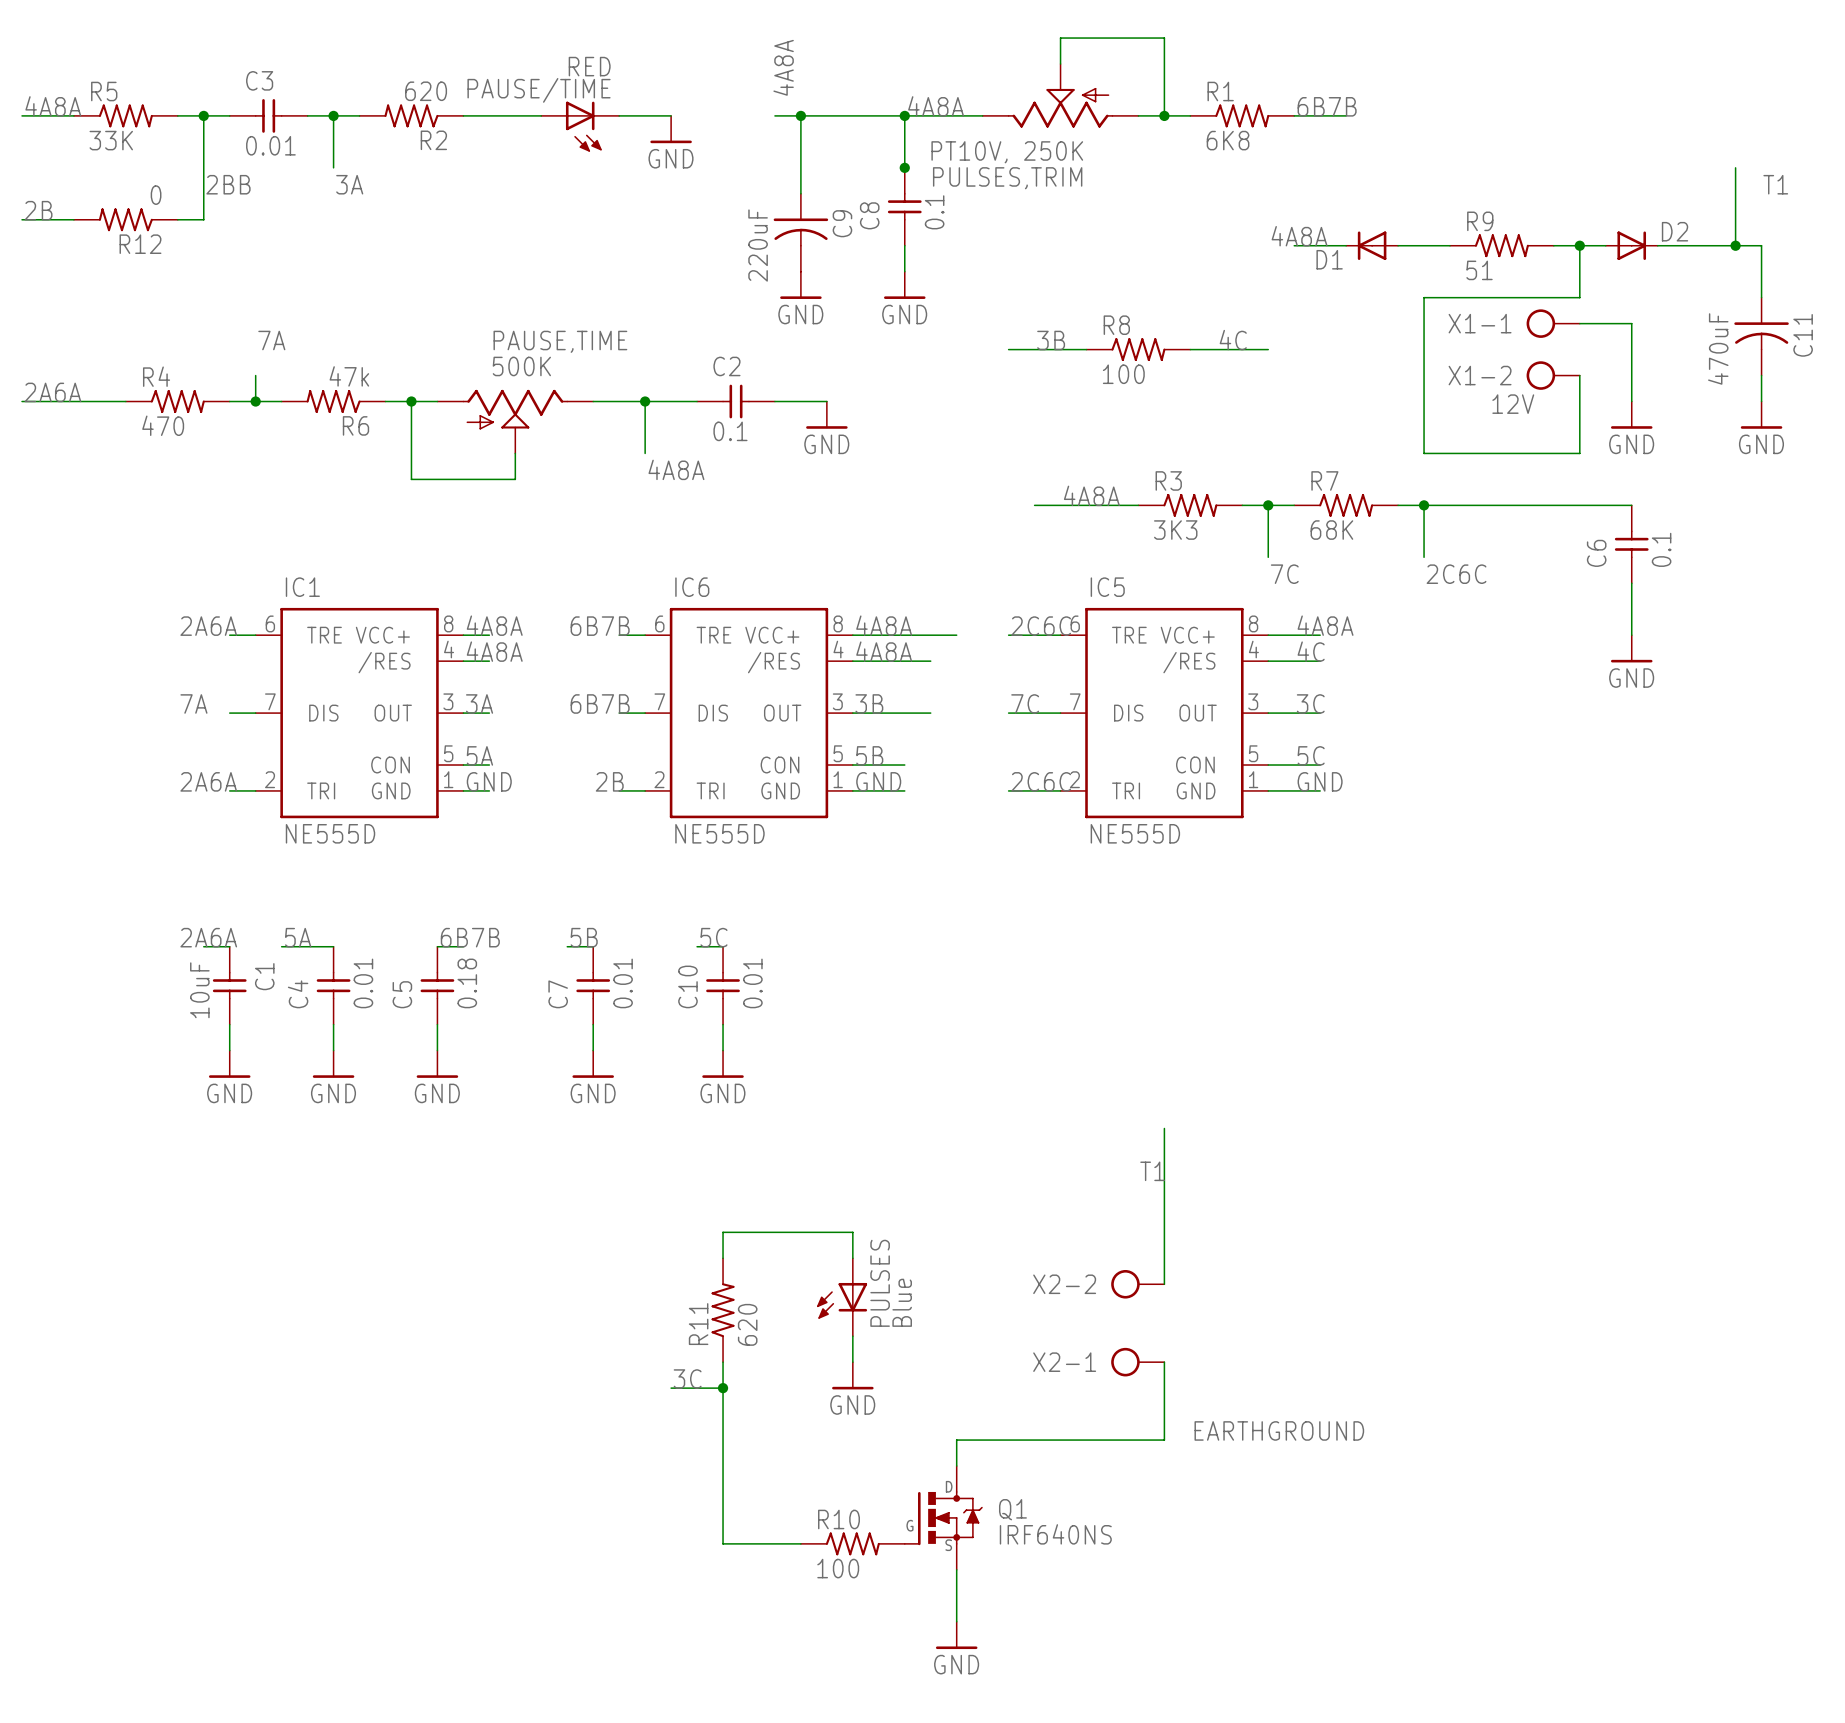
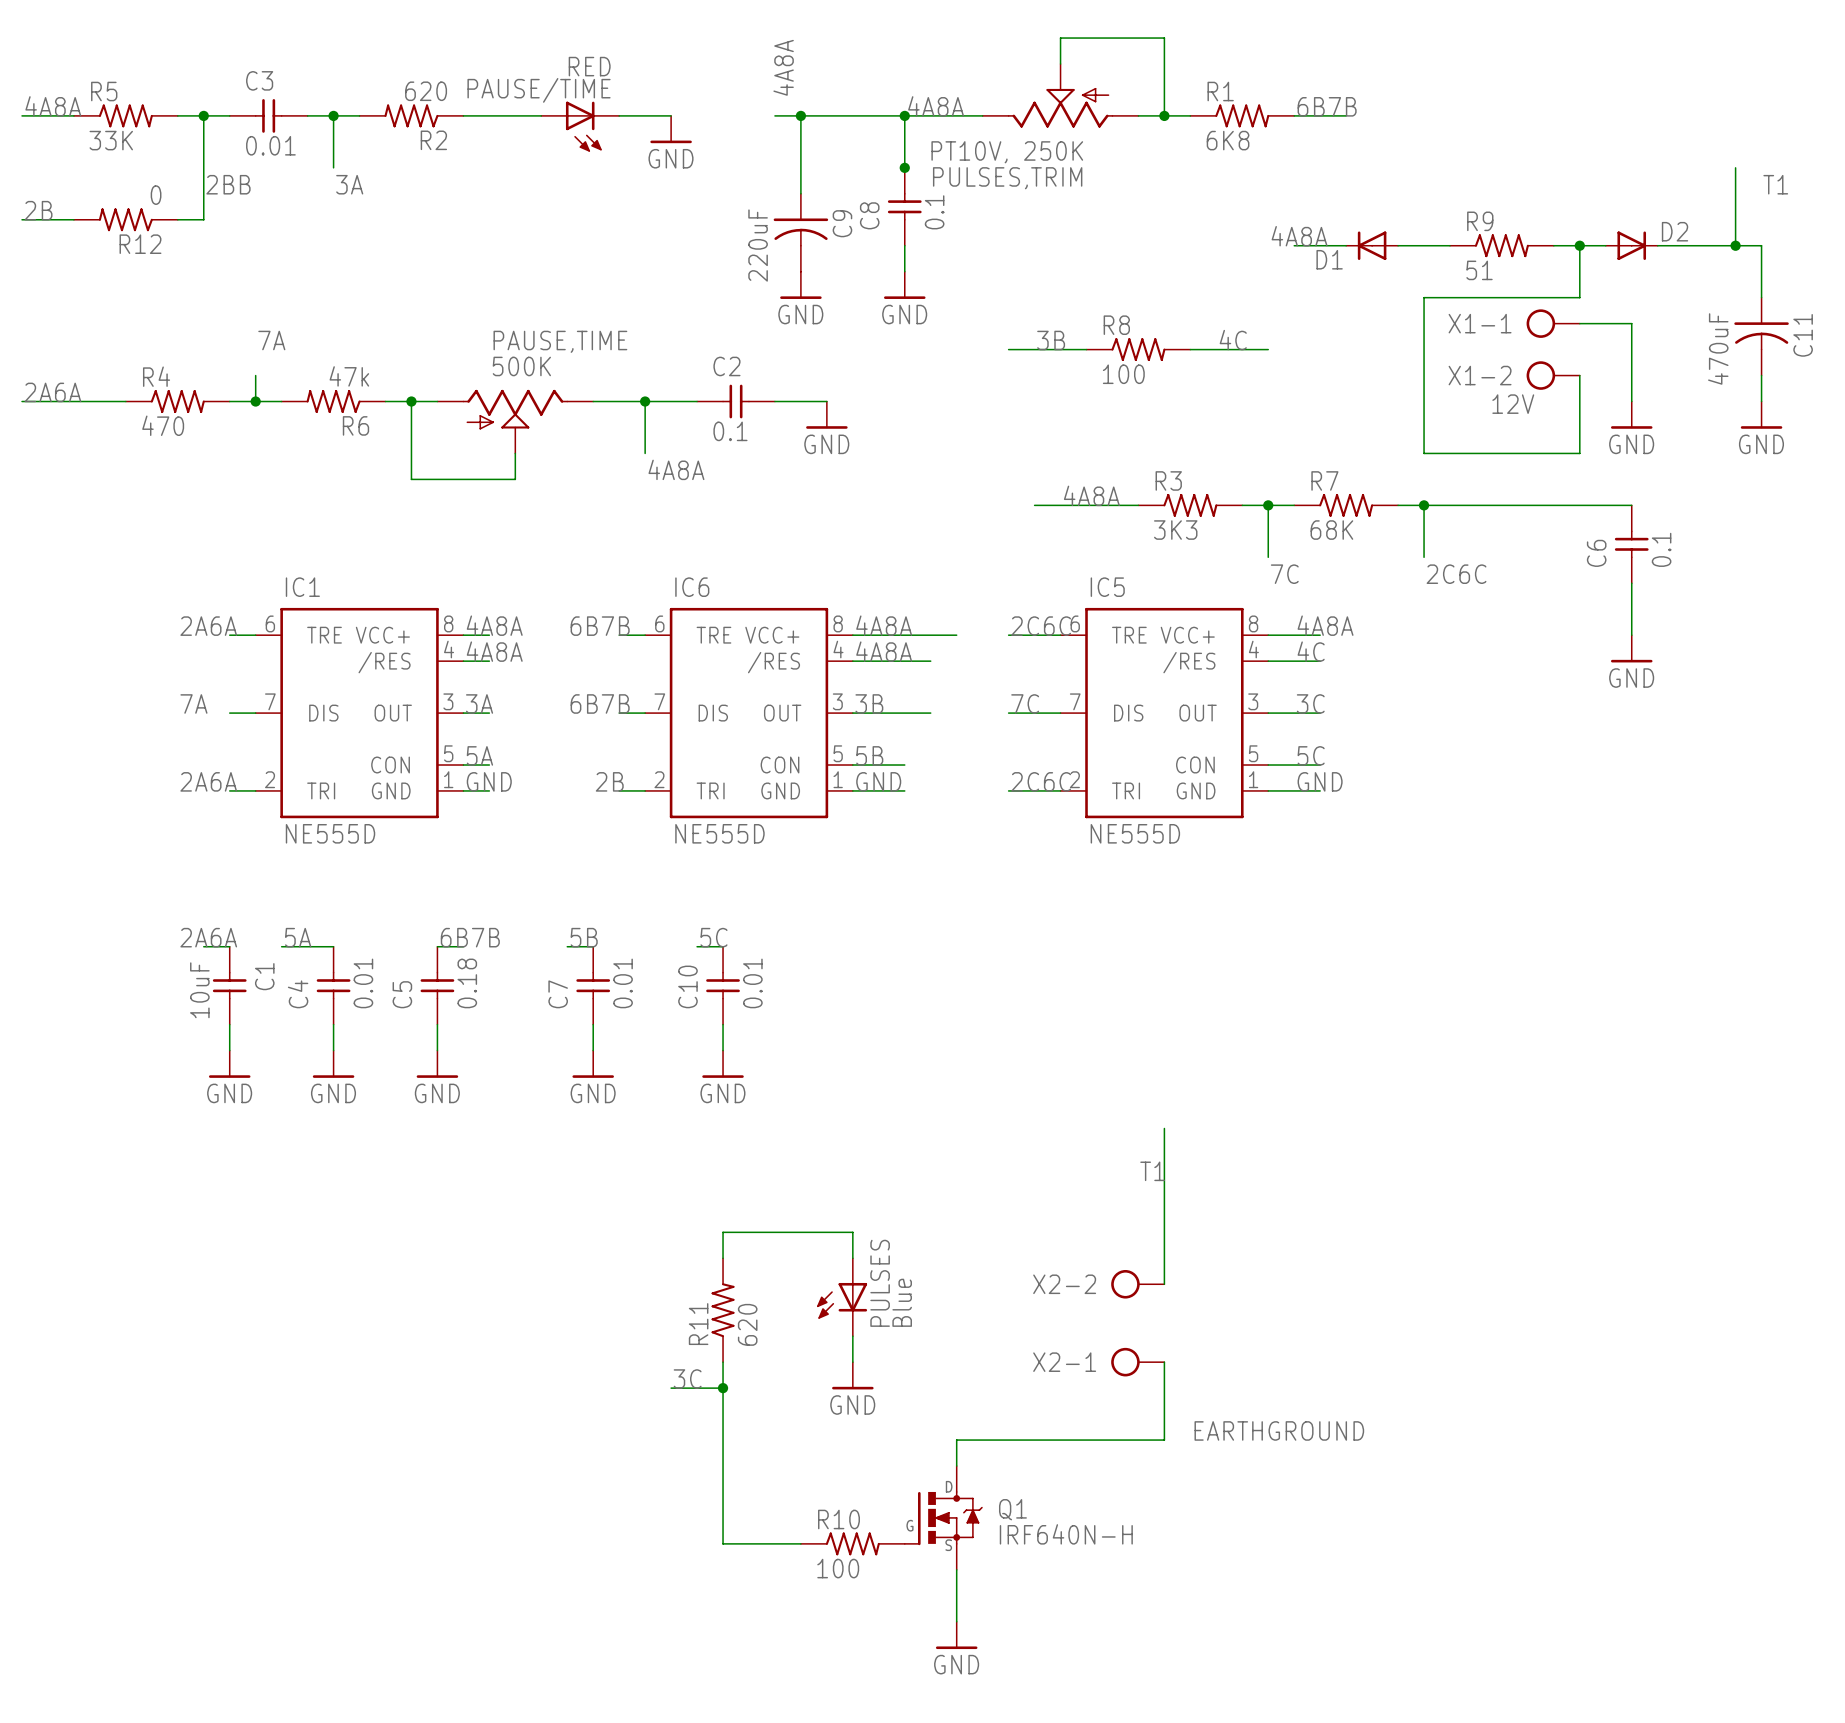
Q1 value: IRF640NS (1055, 1534) -> IRF640N-H (1066, 1534)

